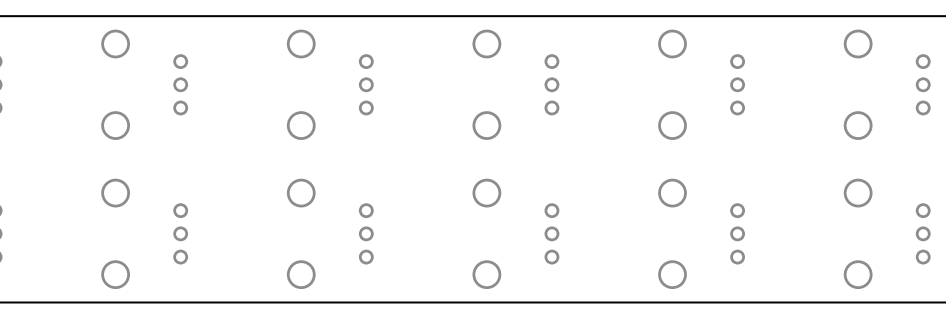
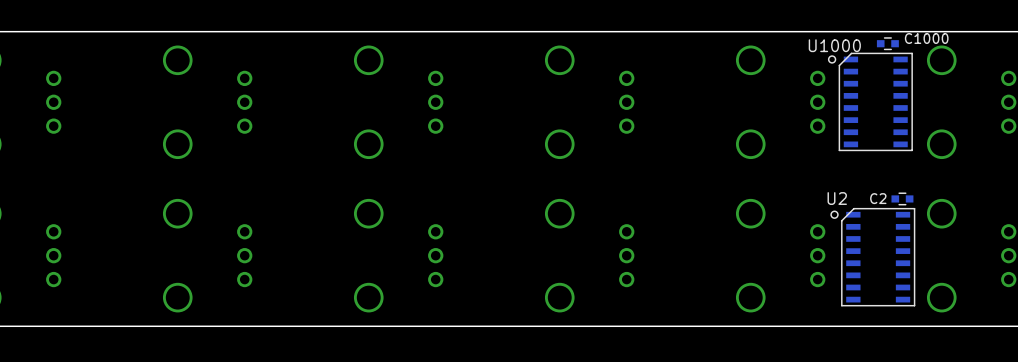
C1000: none -> (887, 43)
U1000: none -> (870, 101)
C2: none -> (902, 198)
U2: none -> (872, 257)

